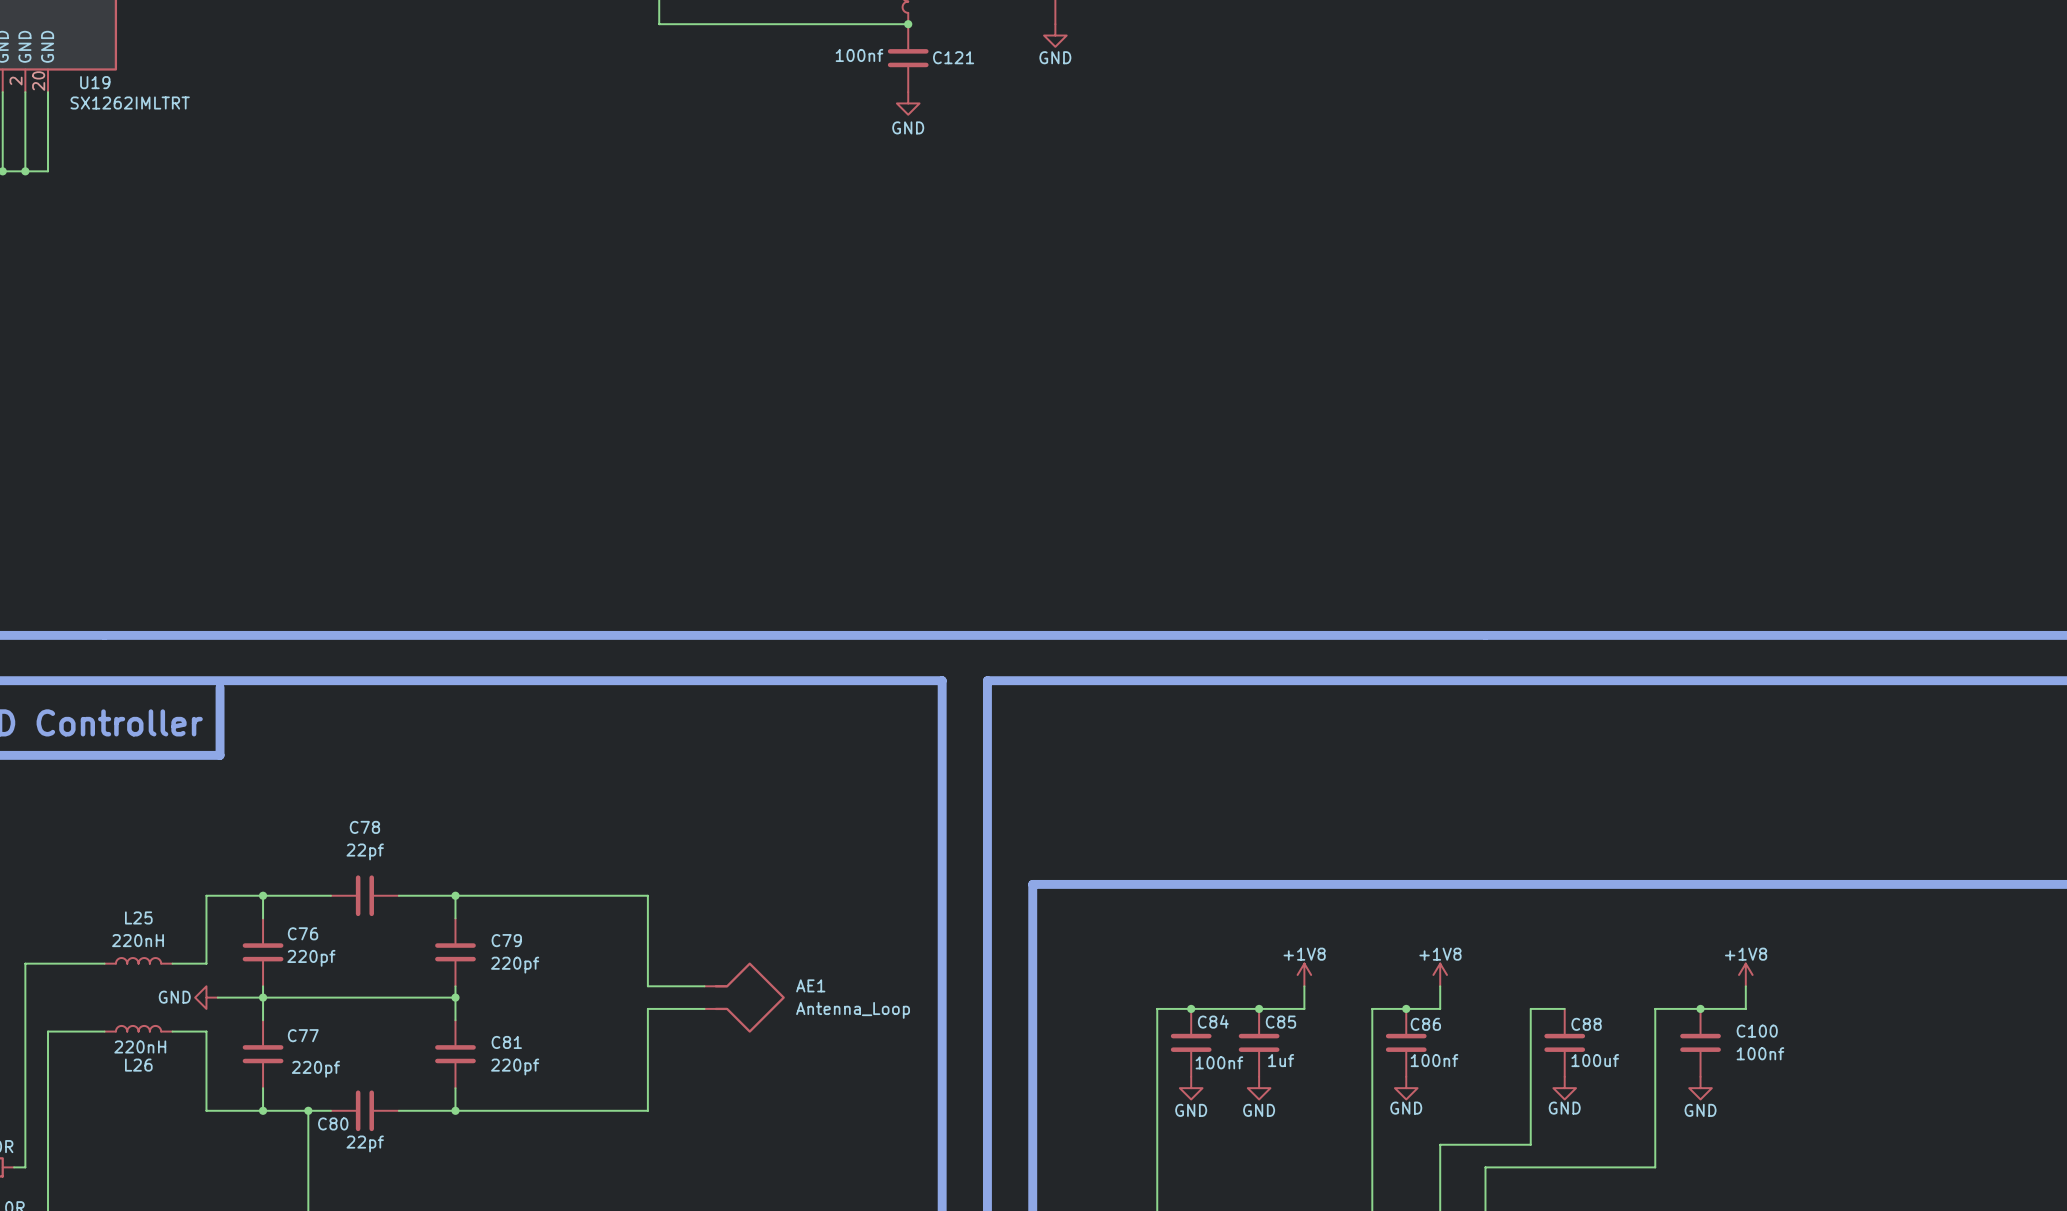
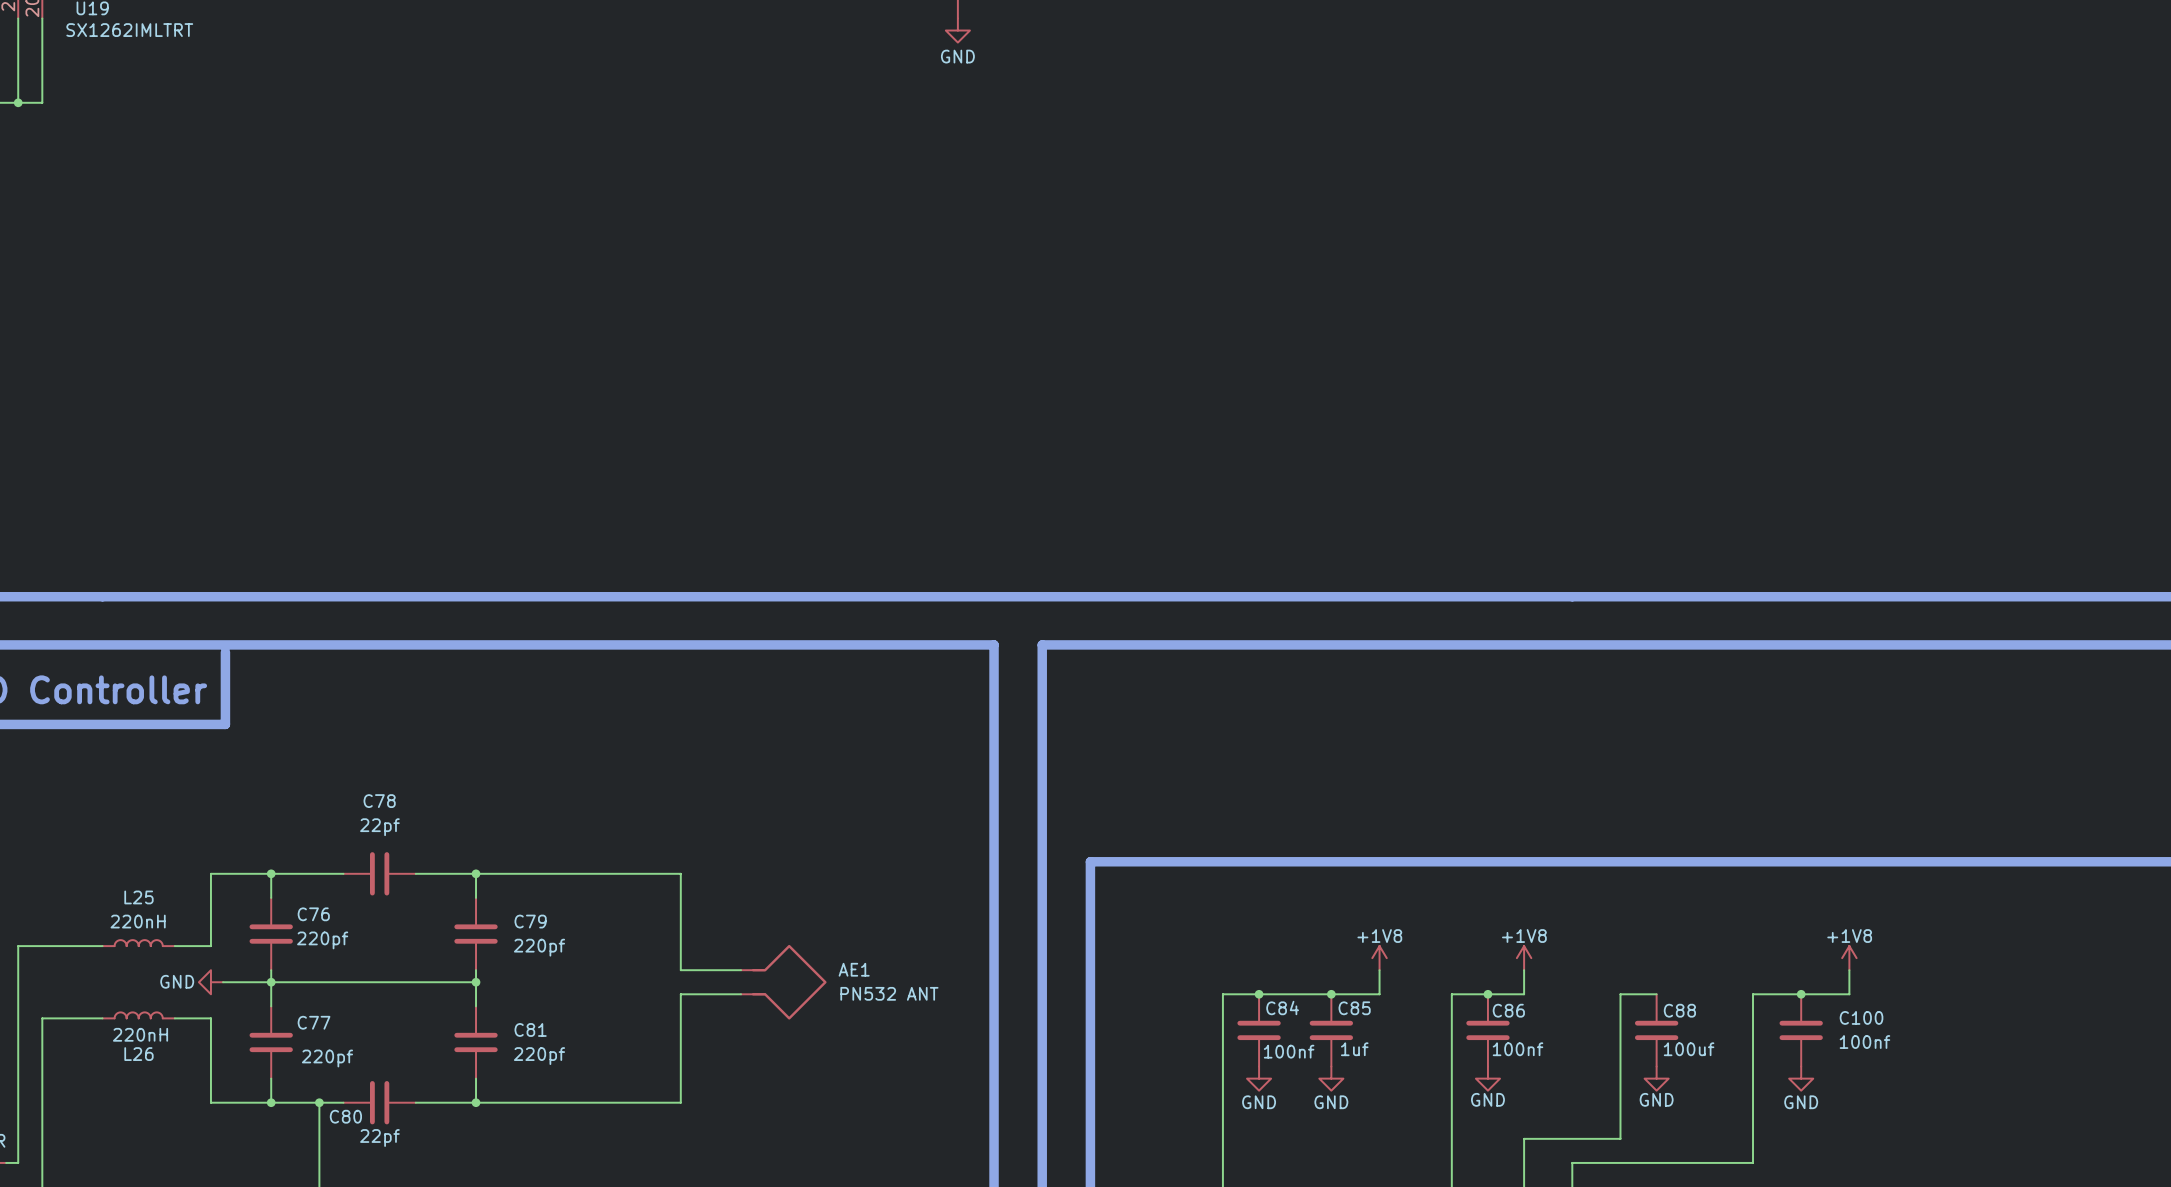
AE1 value: Antenna_Loop (853, 1010) -> PN532 ANT (889, 993)

